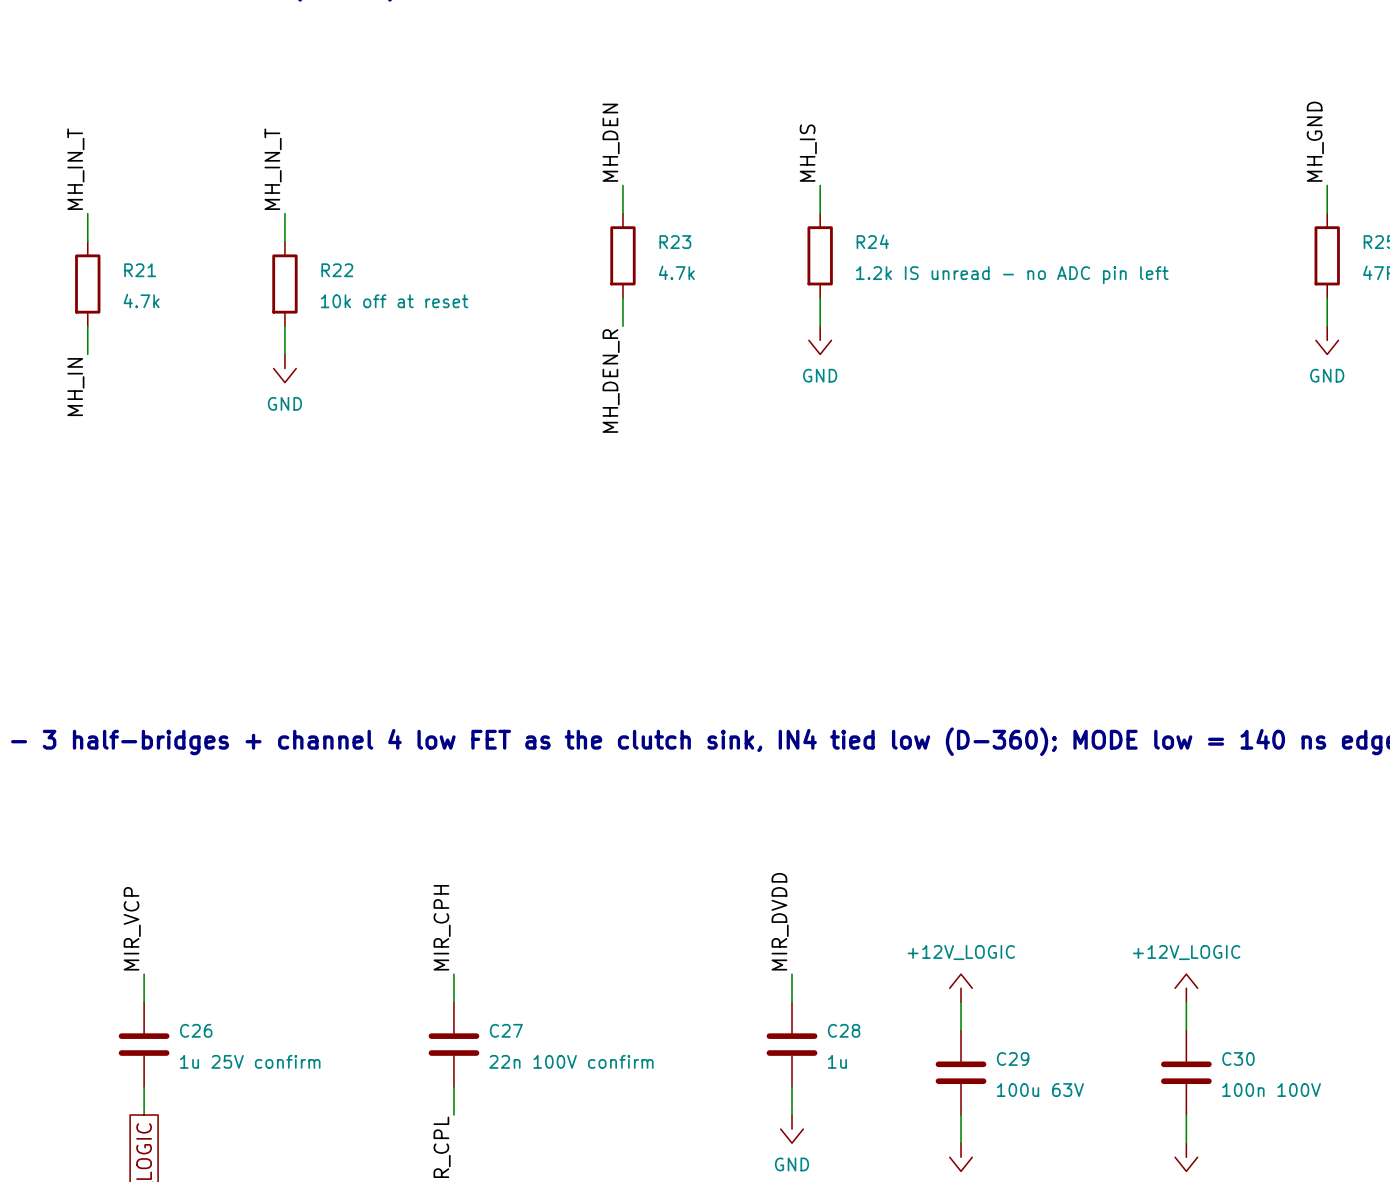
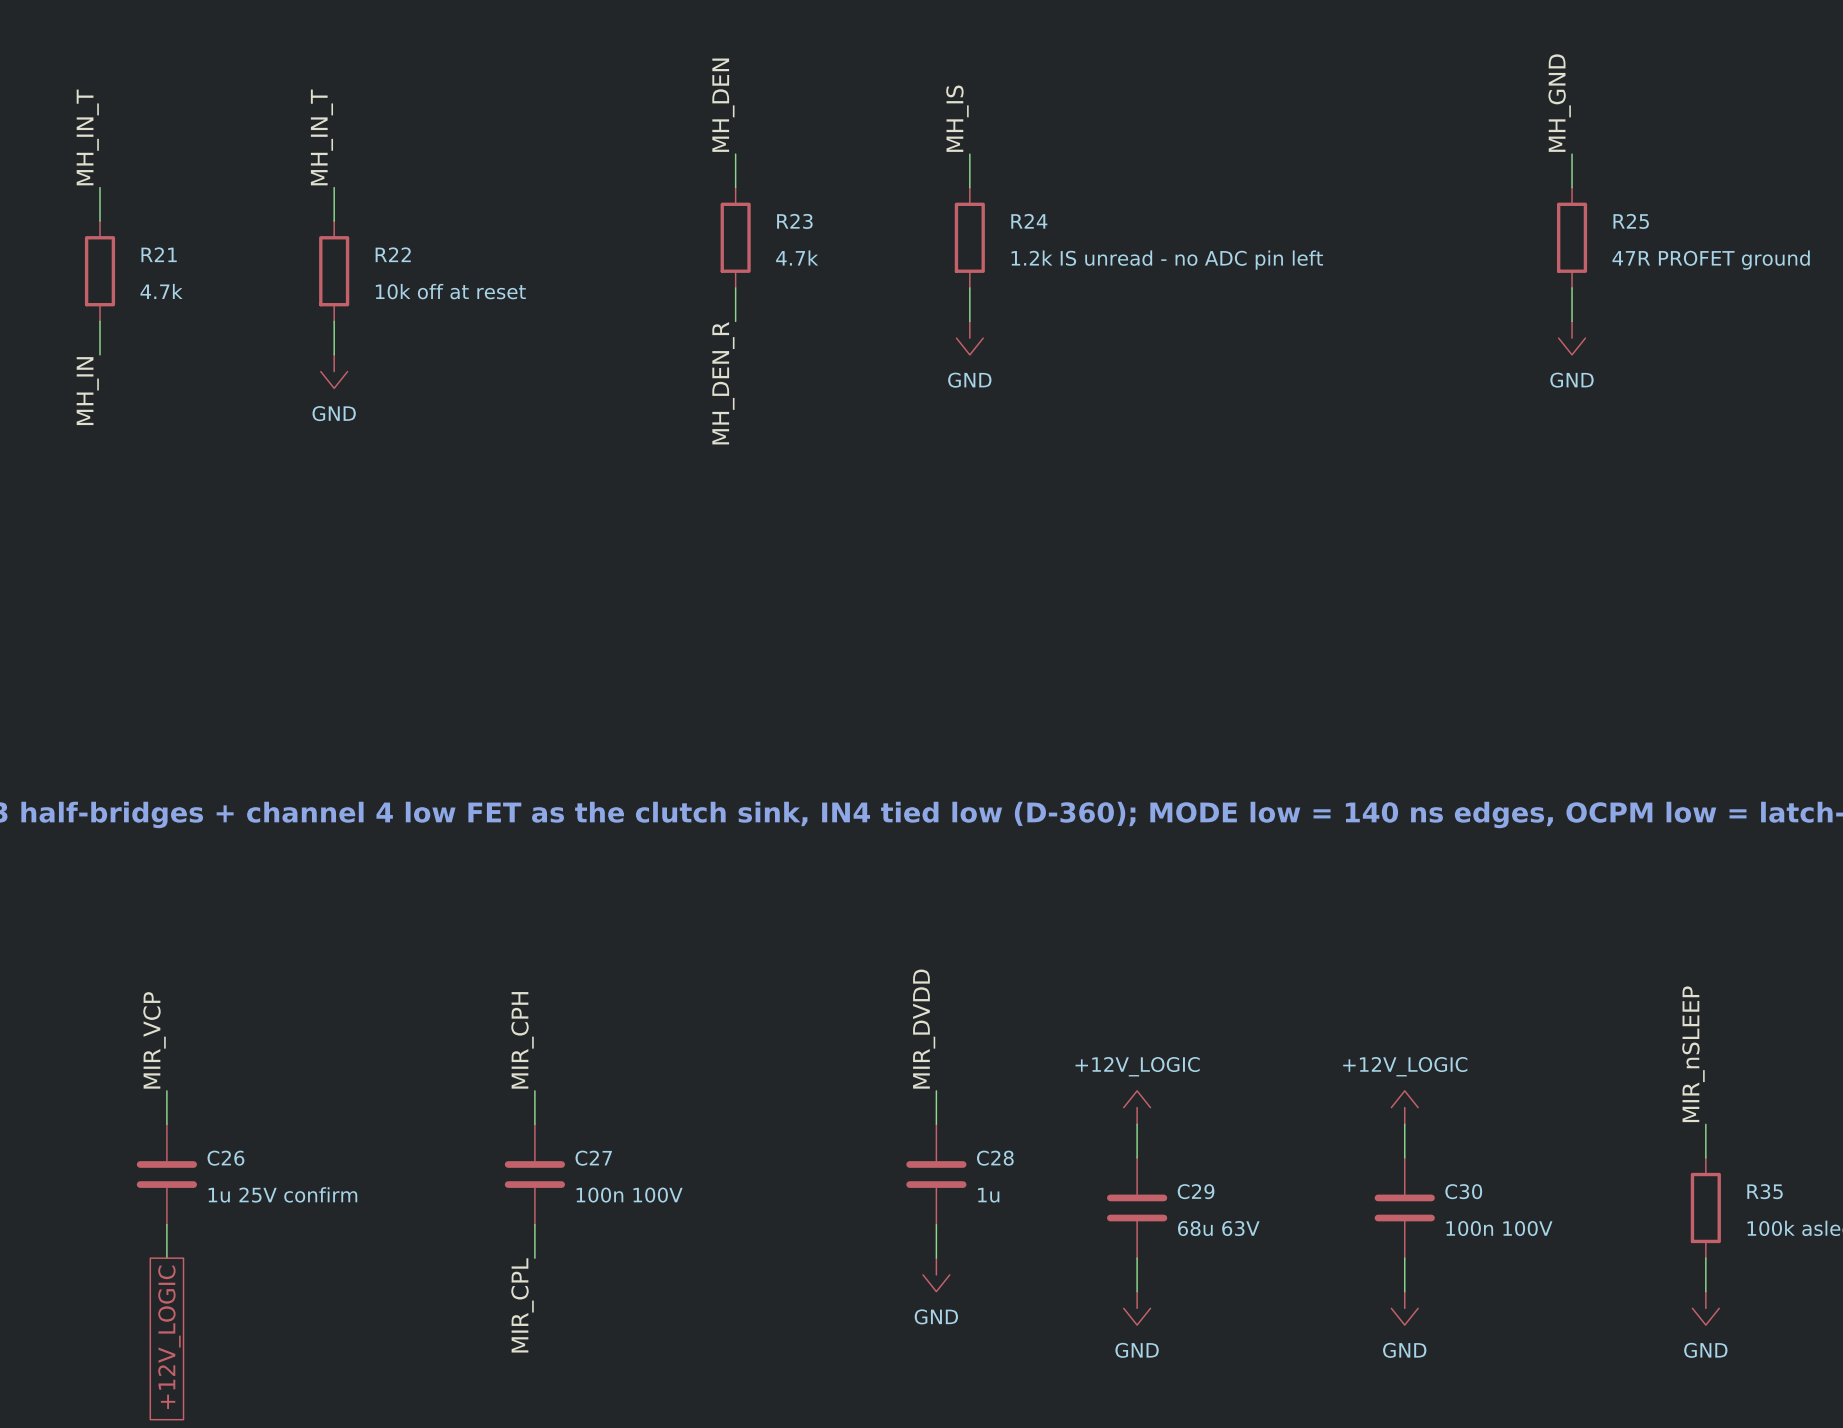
C27 value: 22n 100V confirm (571, 1061) -> 100n 100V (629, 1195)
C29 value: 100u 63V (1040, 1090) -> 68u 63V (1218, 1228)

